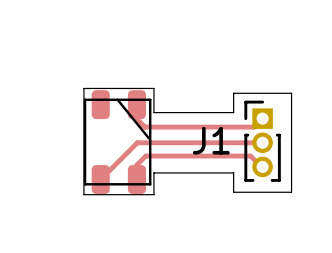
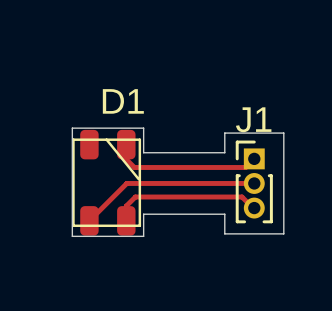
D1 name: none -> D1 (123, 101)
J1 name position: J1 (211, 140) -> J1 (253, 119)

